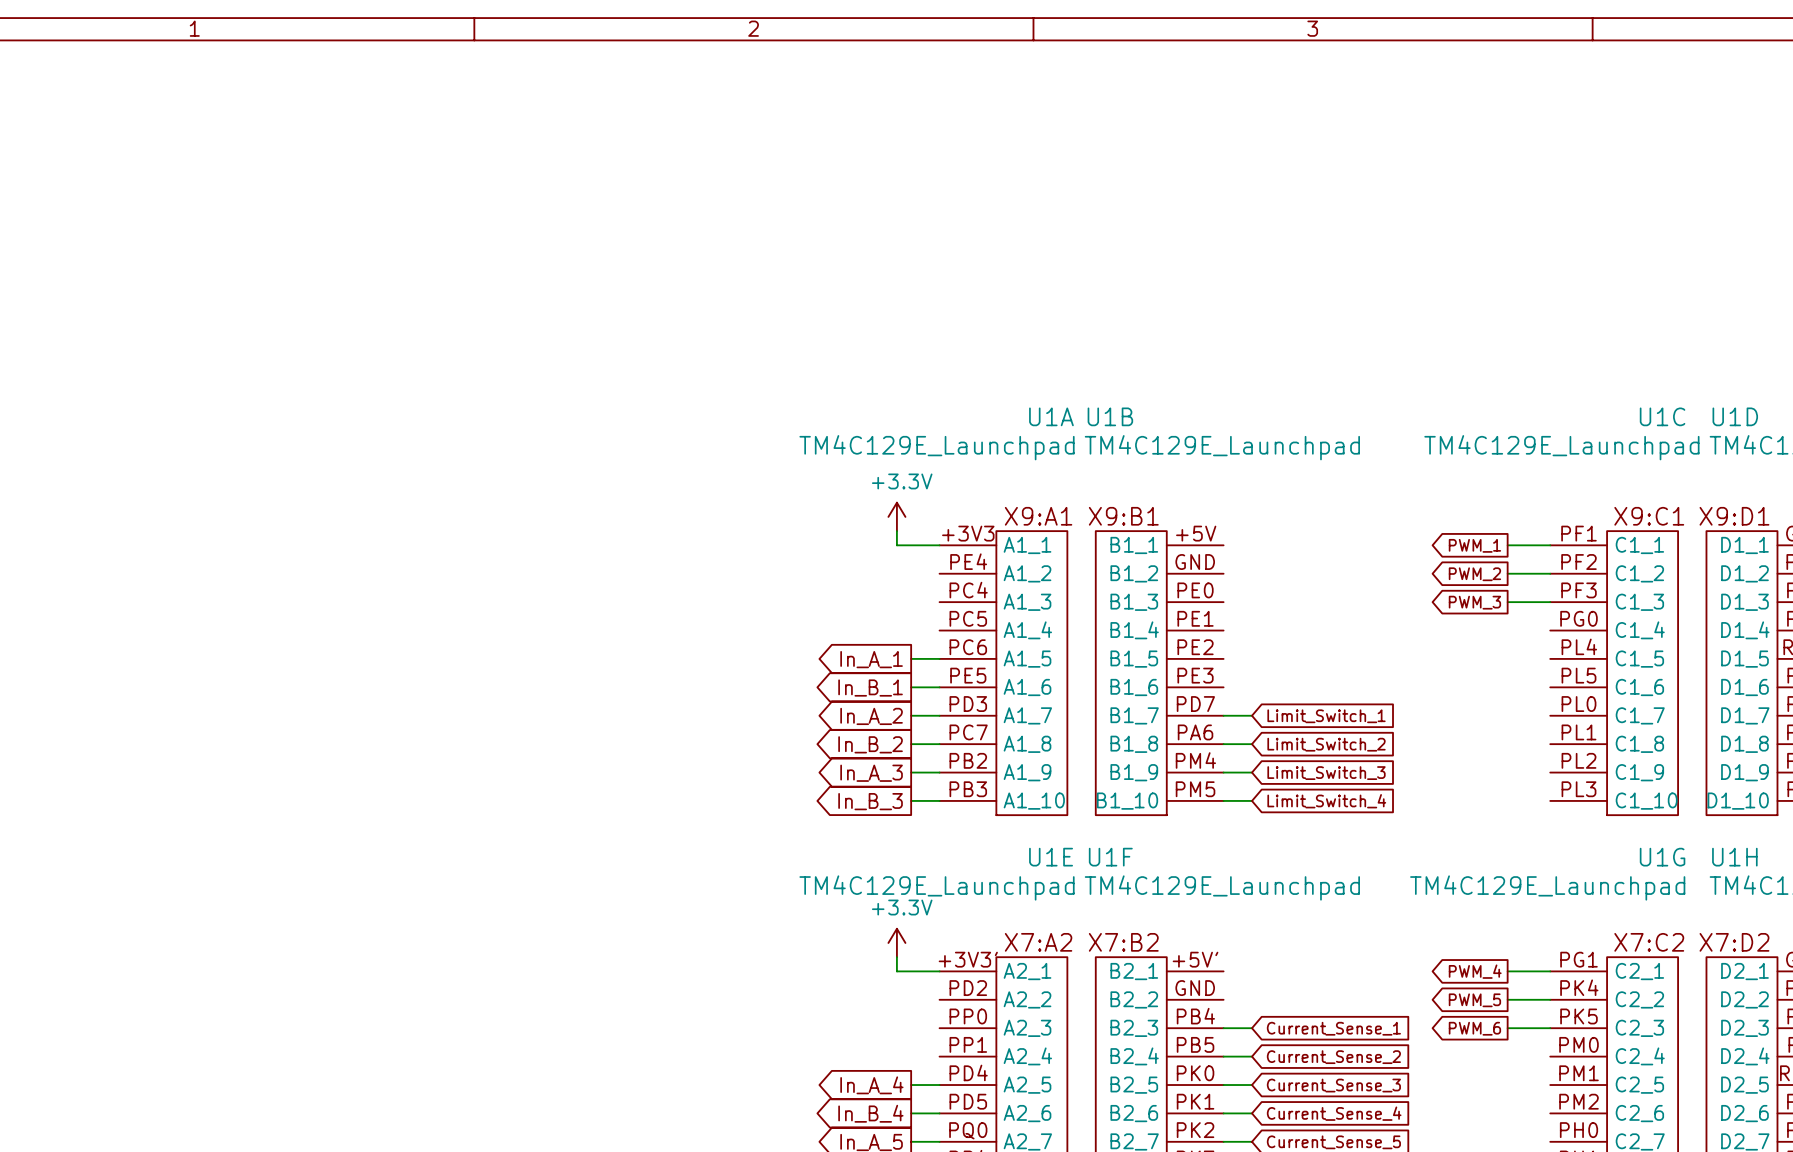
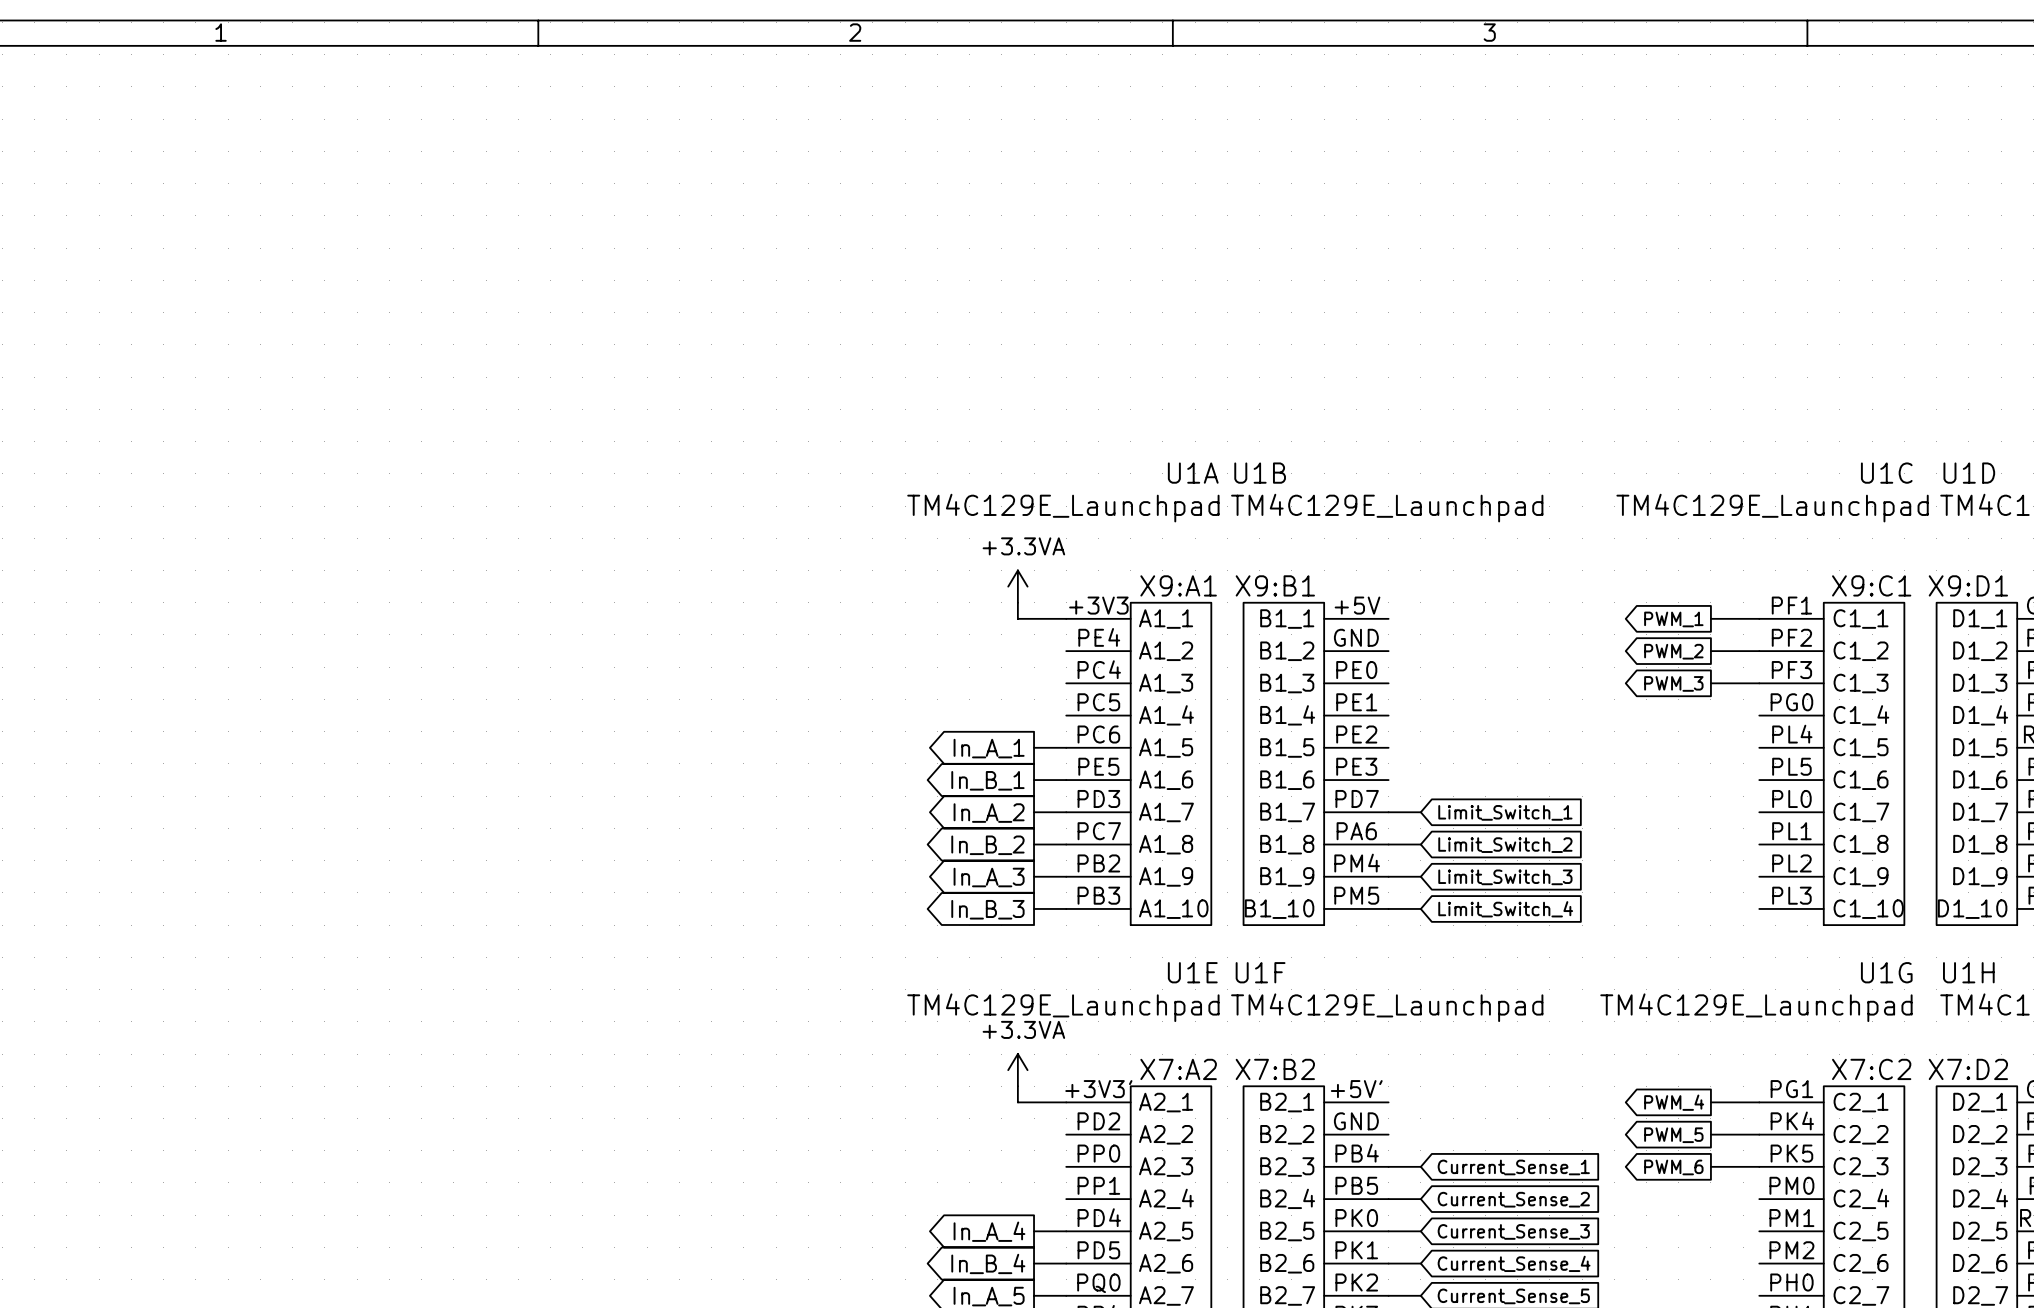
power symbol: +3.3V (896, 516) -> +3.3VA (1017, 586)
power symbol: +3.3V (896, 942) -> +3.3VA (1017, 1070)

